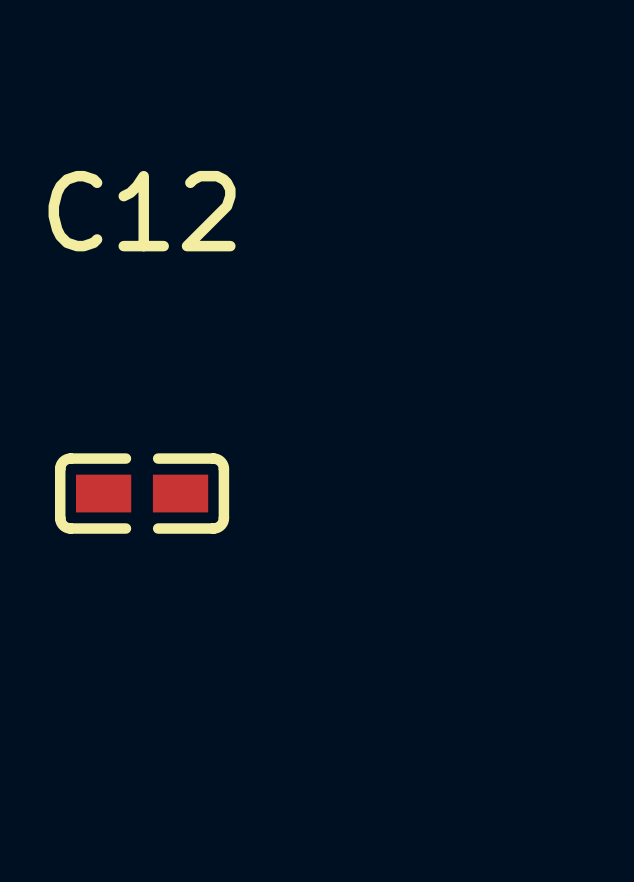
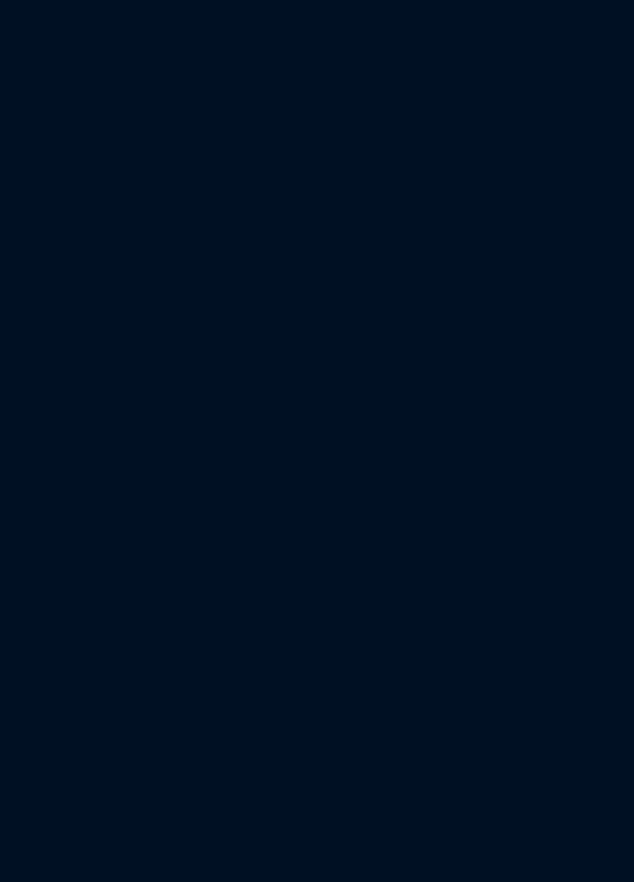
C12: (142, 493) -> none

